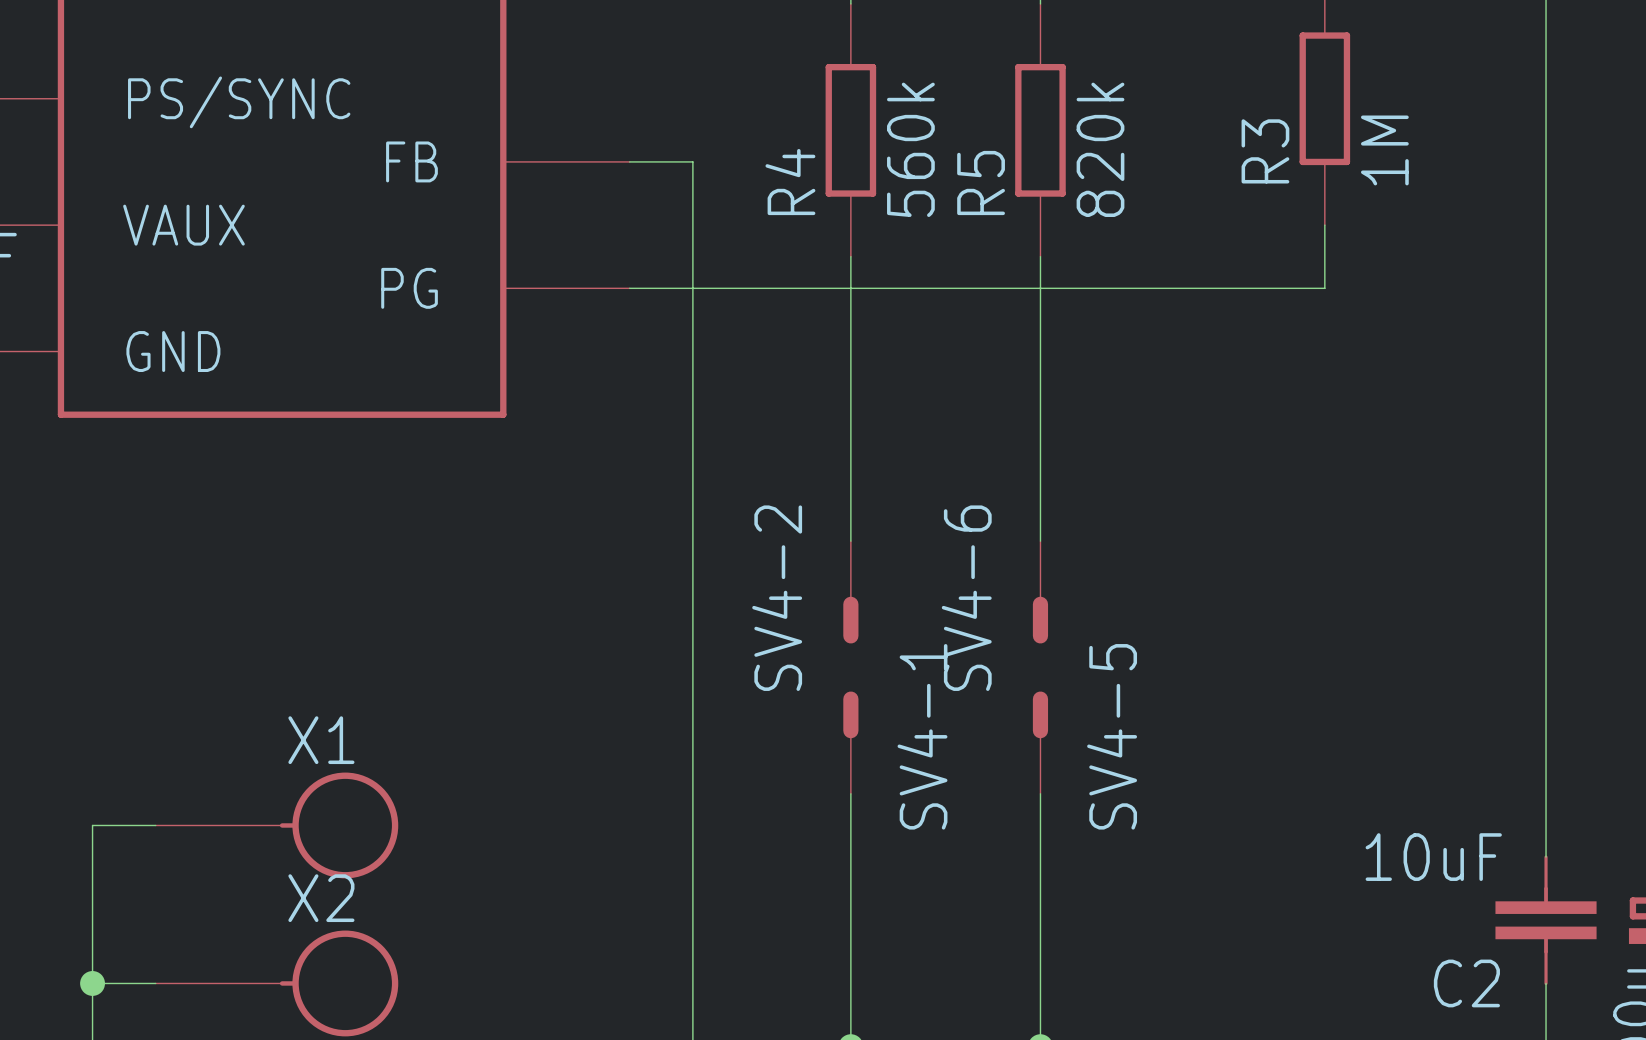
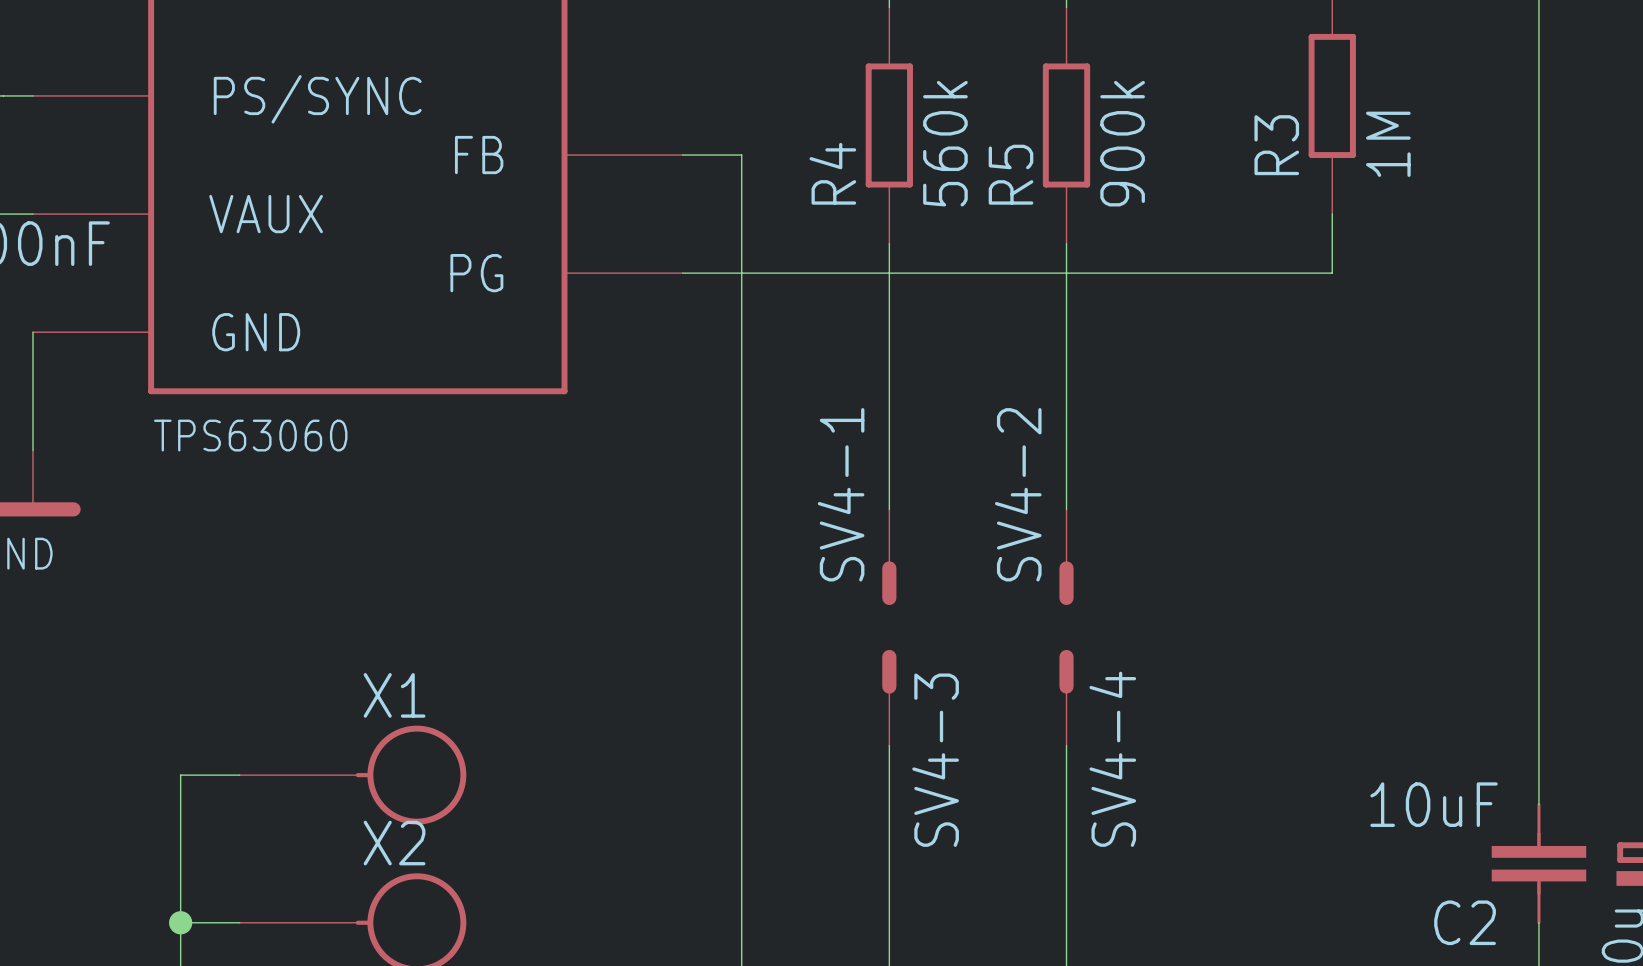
R5 value: 820k (1100, 149) -> 900k (1122, 143)
part value: none -> TPS63060 (250, 435)
SV4-2 name: SV4-2 (777, 598) -> SV4-3 (935, 760)
SV4-6 name: SV4-6 (966, 598) -> SV4-4 (1112, 759)
SV4-1 name position: SV4-1 (922, 736) -> SV4-1 (841, 494)
SV4-5 name: SV4-5 (1112, 736) -> SV4-2 (1018, 494)

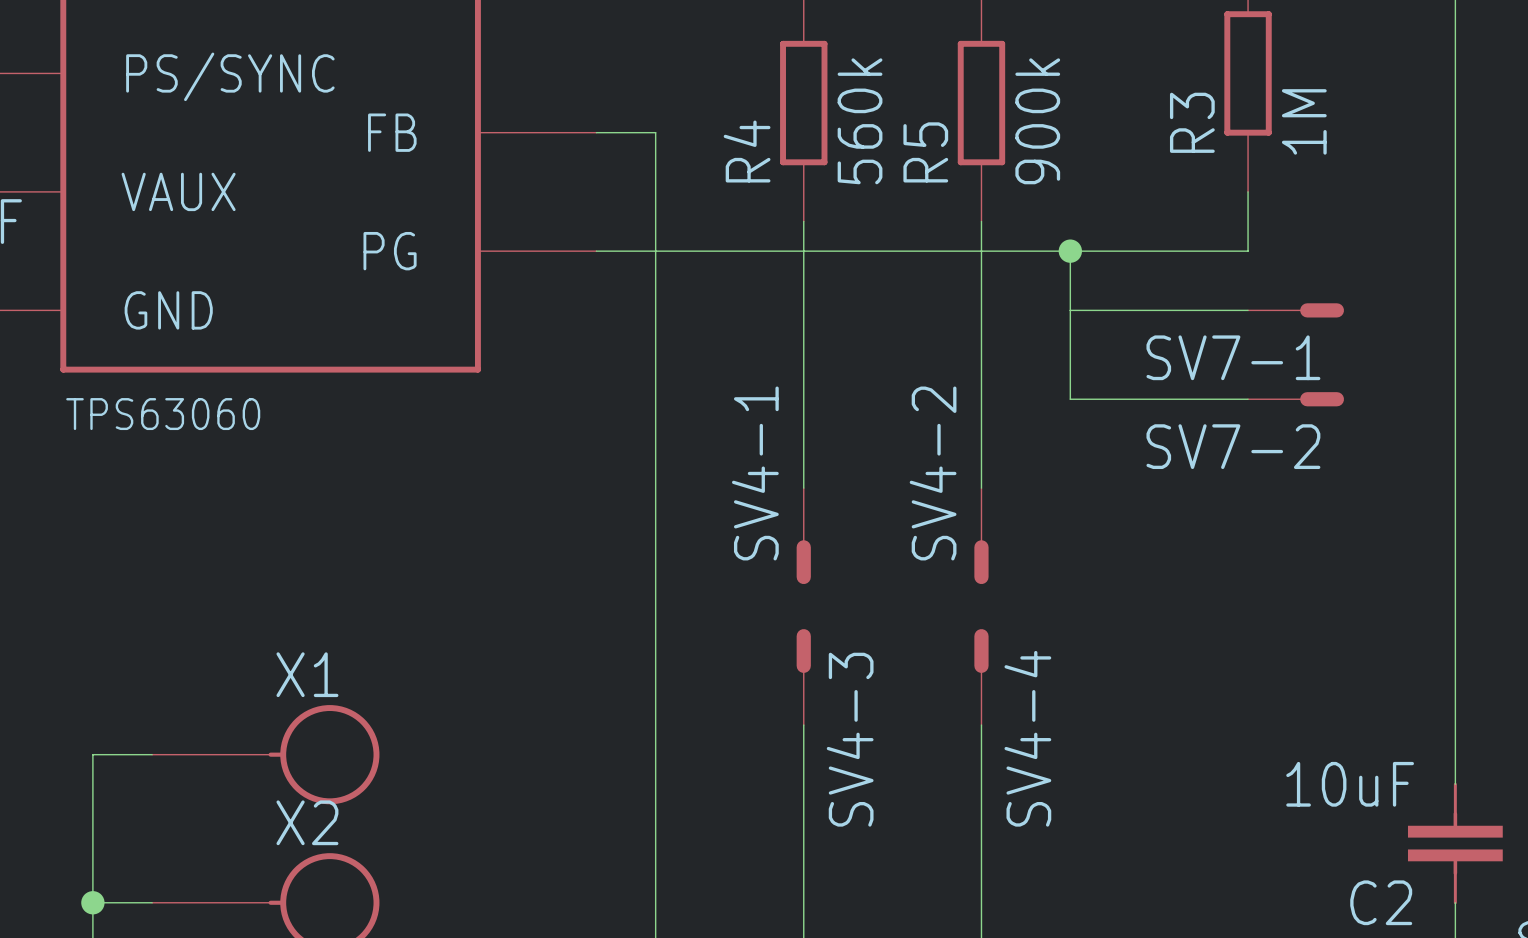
wire: none -> (1070, 251) (1070, 399) (1248, 399)
junction: none -> (1070, 251)
wire: none -> (1070, 310) (1248, 310)
SV7-1: none -> (1296, 310)
SV7-2: none -> (1296, 399)

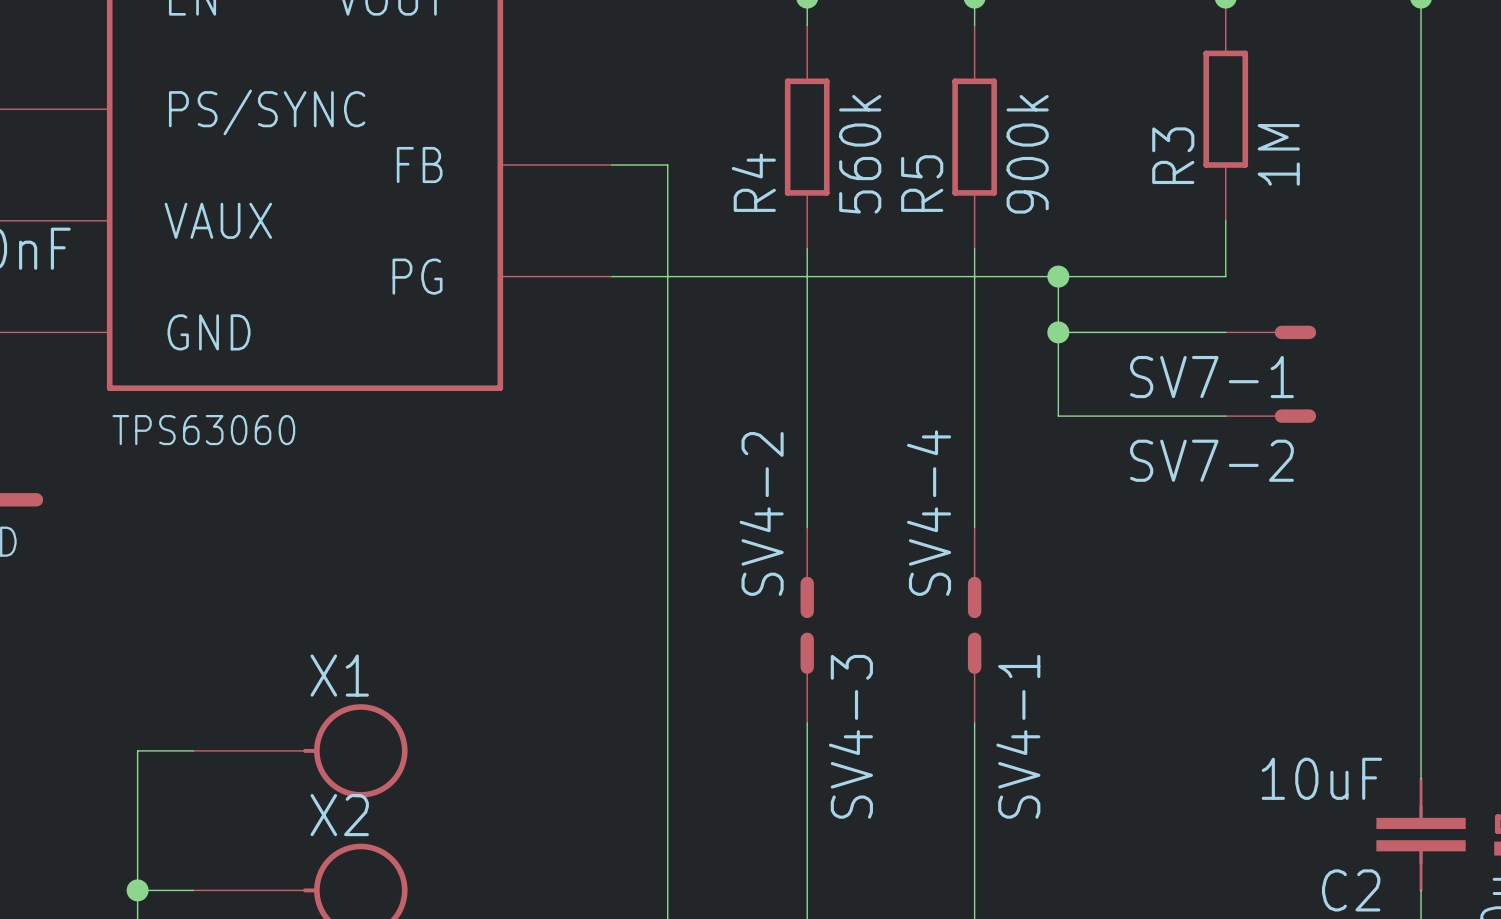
junction: none -> (1058, 332)
SV4-1: (803, 536) -> none
SV4-2 position: (981, 536) -> (807, 572)
SV4-4: none -> (974, 572)
SV4-4 name: SV4-4 (1027, 738) -> SV4-1 (1018, 736)

